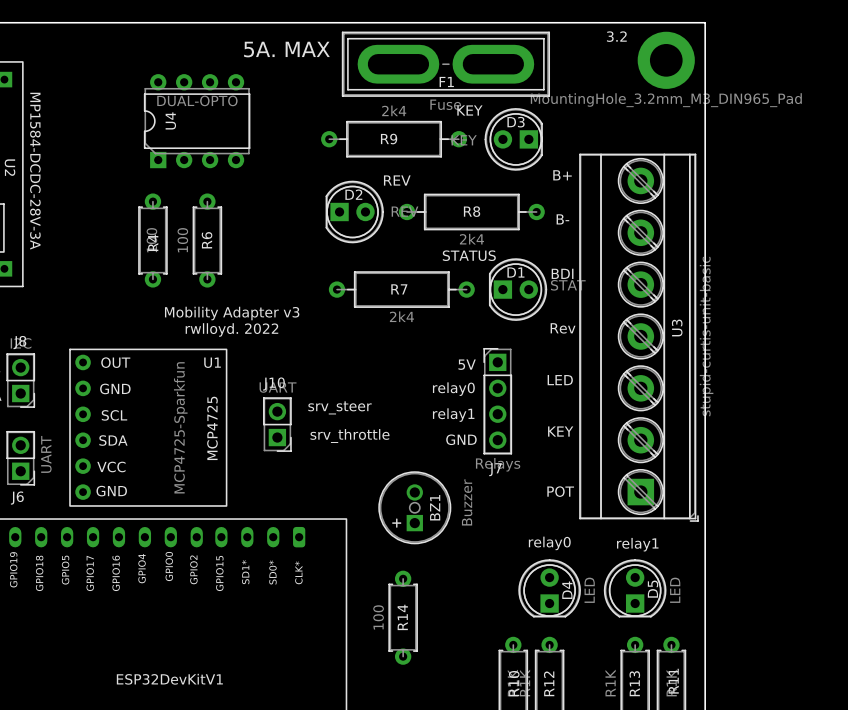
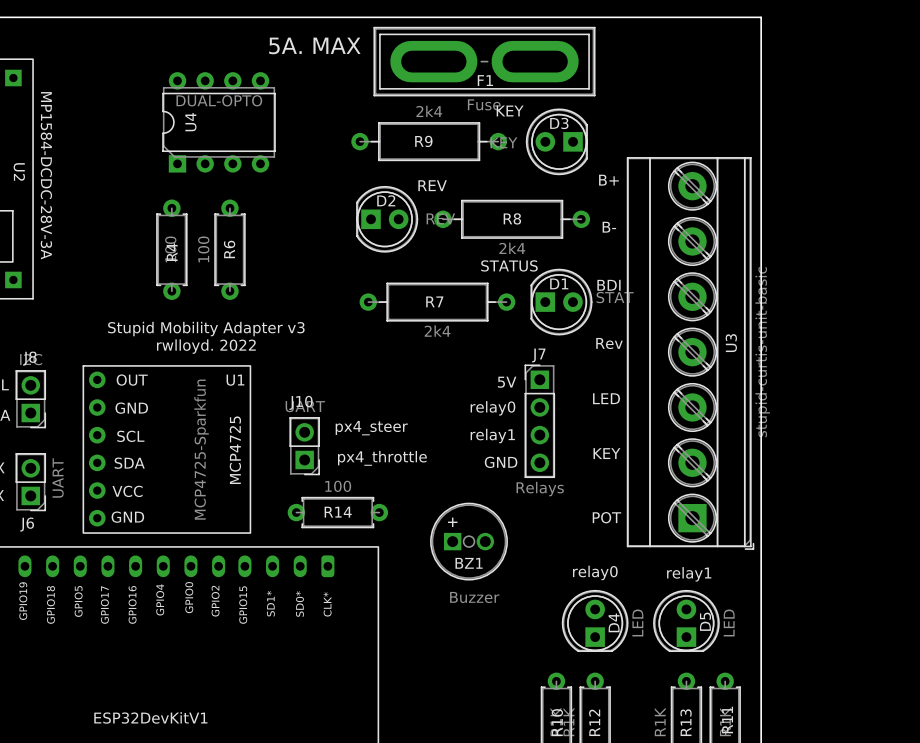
3.2: MountingHole_3.2mm_M3_DIN965_Pad (666, 60) -> none
text: Mobility Adapter v3 (232, 313) -> Stupid Mobility Adapter v3 (206, 329)
text position: rwlloyd. 2022 (231, 329) -> rwlloyd. 2022 (206, 346)
text: srv_steer (339, 407) -> px4_steer (371, 428)
text: srv_throttle (349, 436) -> px4_throttle (382, 458)
J7 name position: J7 (495, 469) -> J7 (538, 355)
BZ1 rotation: 0° (414, 507) -> 90° clockwise (469, 541)
R14 rotation: 0° (403, 617) -> 90° clockwise (337, 512)
R14 position: (403, 617) -> (337, 512)
part value position: ESP32DevKitV1 (169, 679) -> ESP32DevKitV1 (150, 717)

